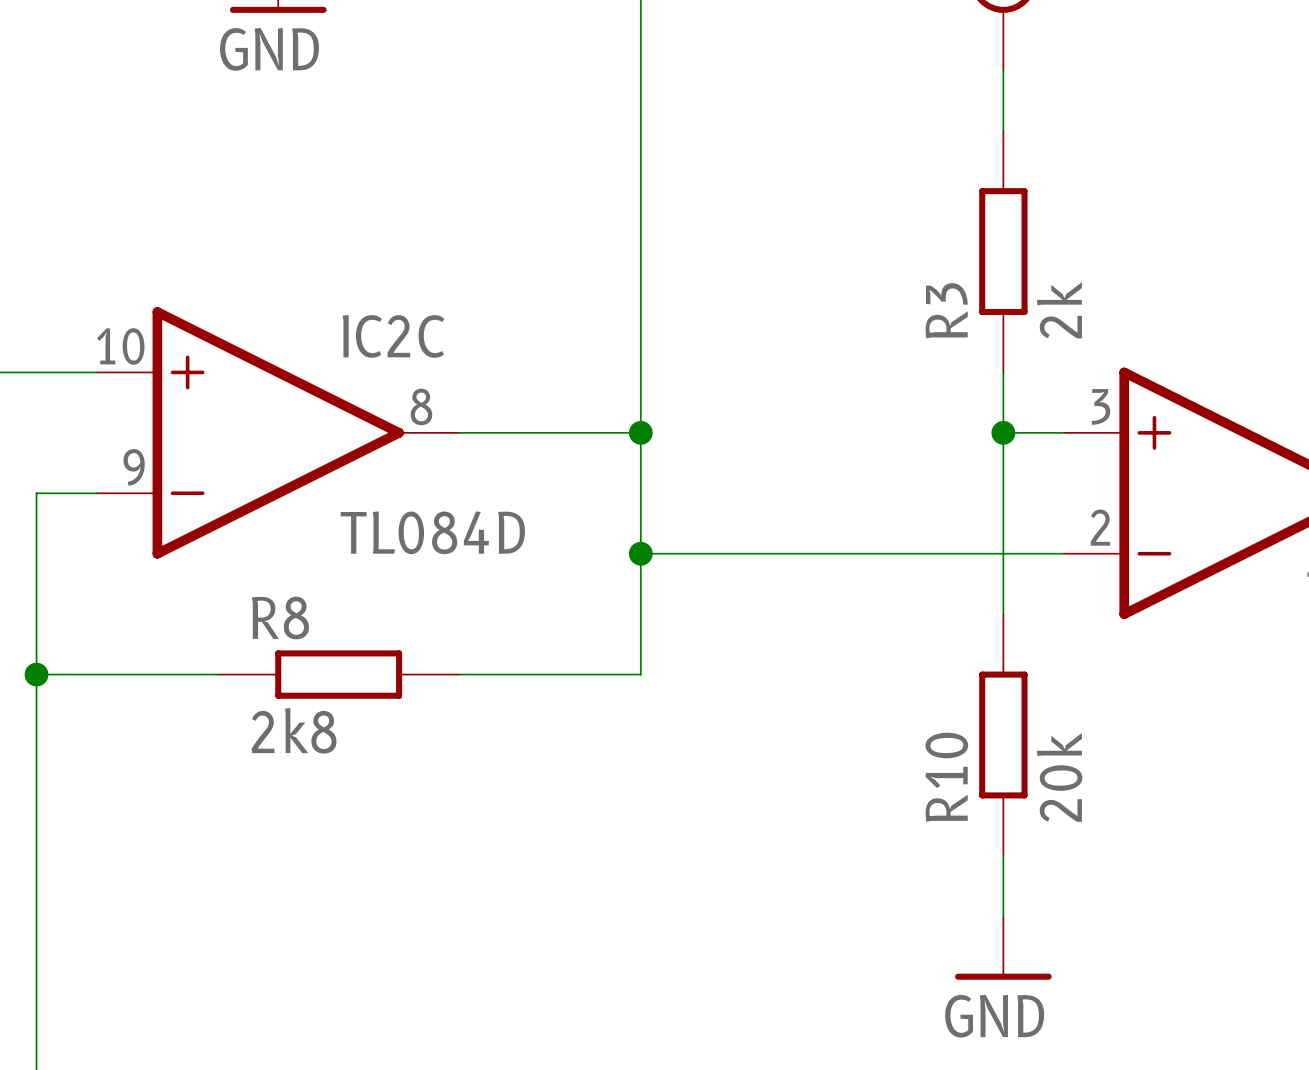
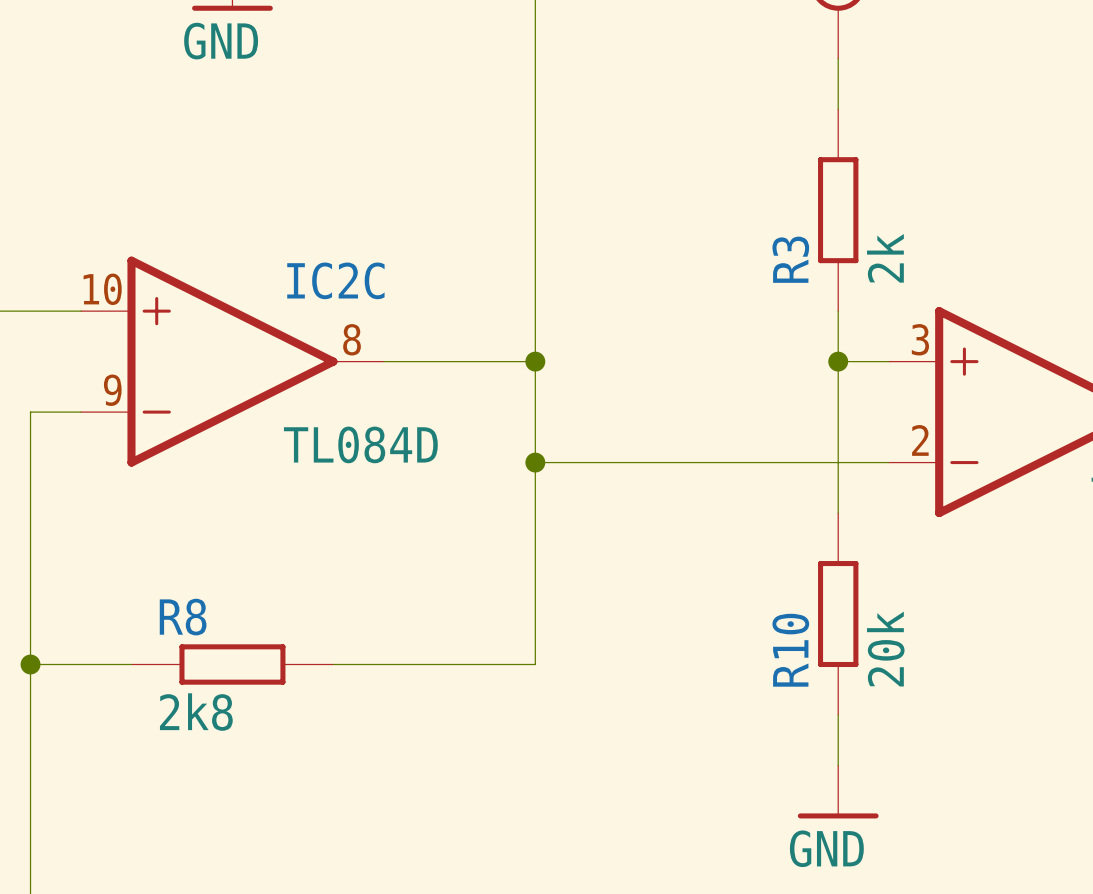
wire: (36, 674) (217, 674) -> none
junction position: (36, 674) -> (30, 664)
R8 position: (338, 674) -> (232, 664)
wire: (459, 674) (640, 674) -> (333, 664) (535, 664) (535, 563)
wire: none -> (30, 664) (131, 664)

